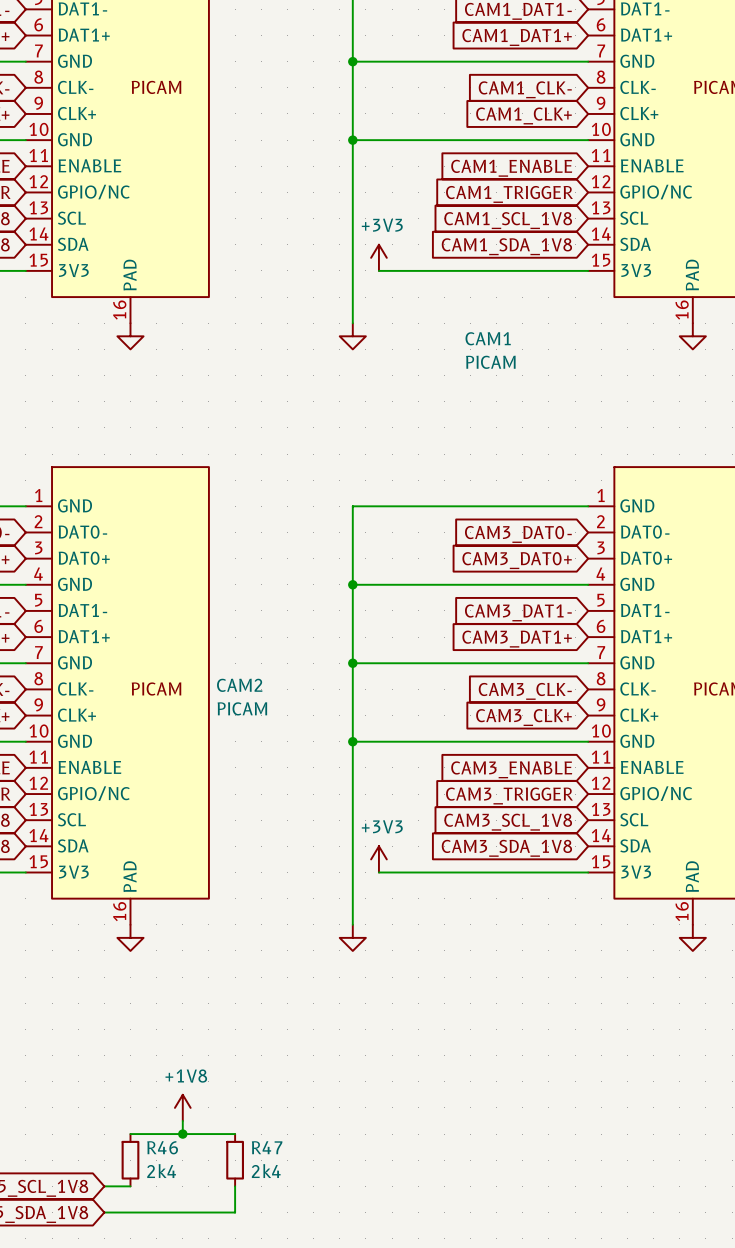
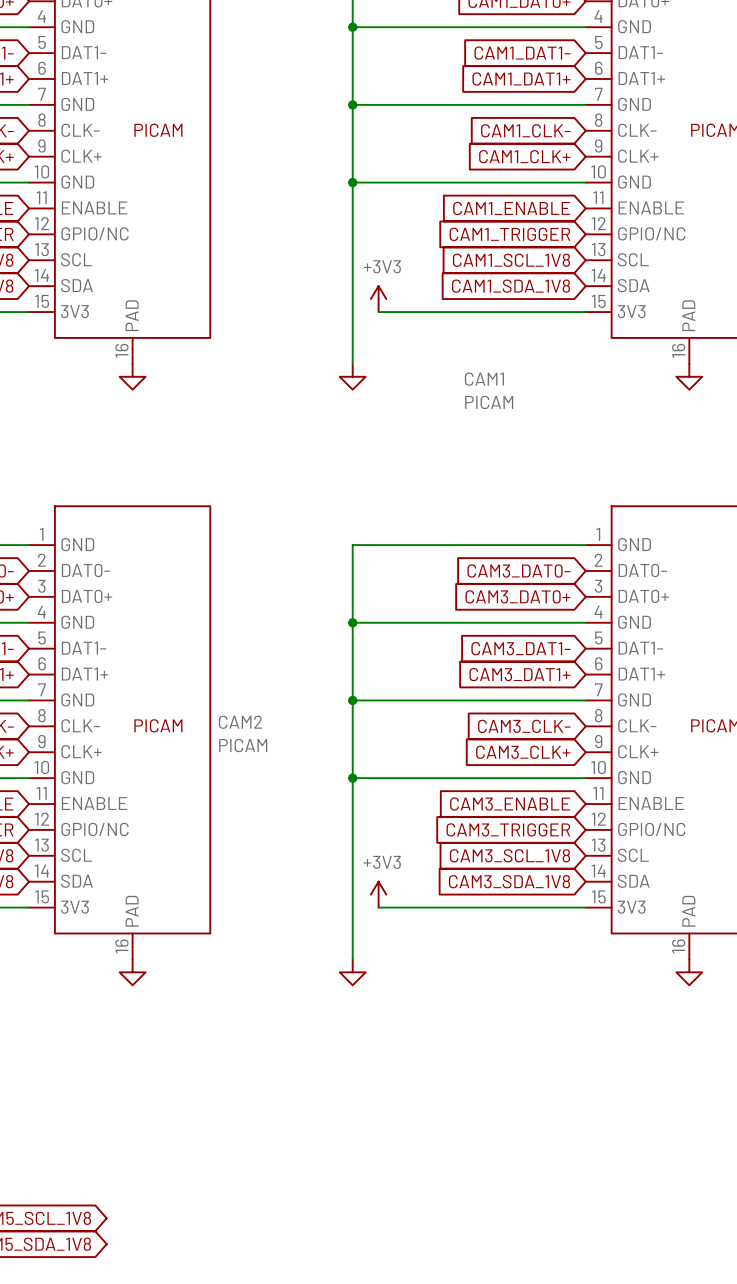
power symbol: +1V8 (182, 1107) -> none
wire: (182, 1120) (182, 1134) -> none
wire: (130, 1134) (235, 1134) -> none
junction: (182, 1134) -> none
R46: 2k4 (130, 1160) -> none
R47: 2k4 (235, 1160) -> none
wire: (104, 1186) (130, 1186) -> none
wire: (235, 1186) (235, 1212) (104, 1212) -> none

